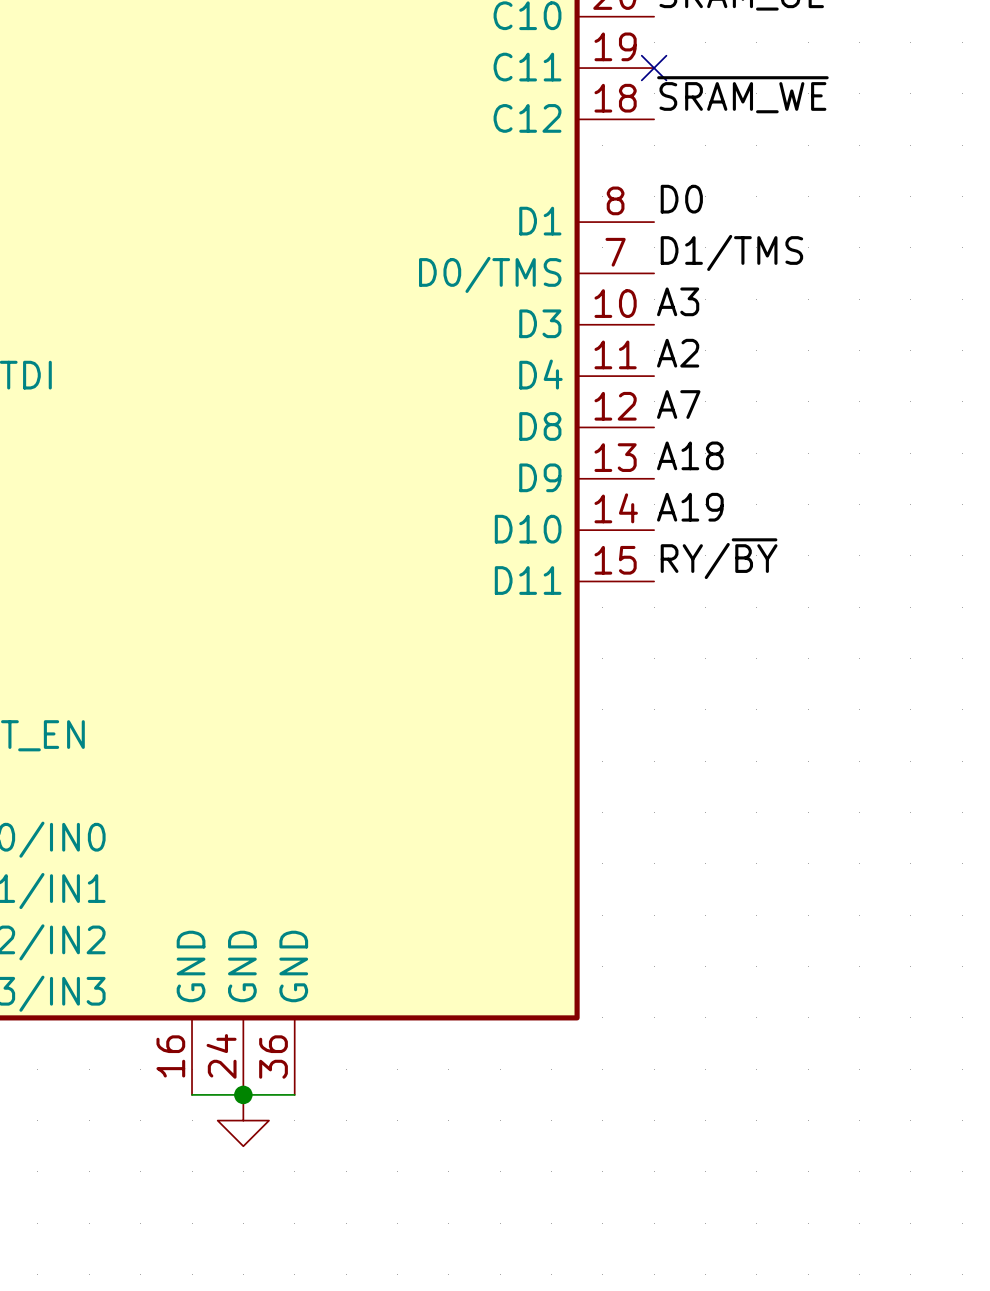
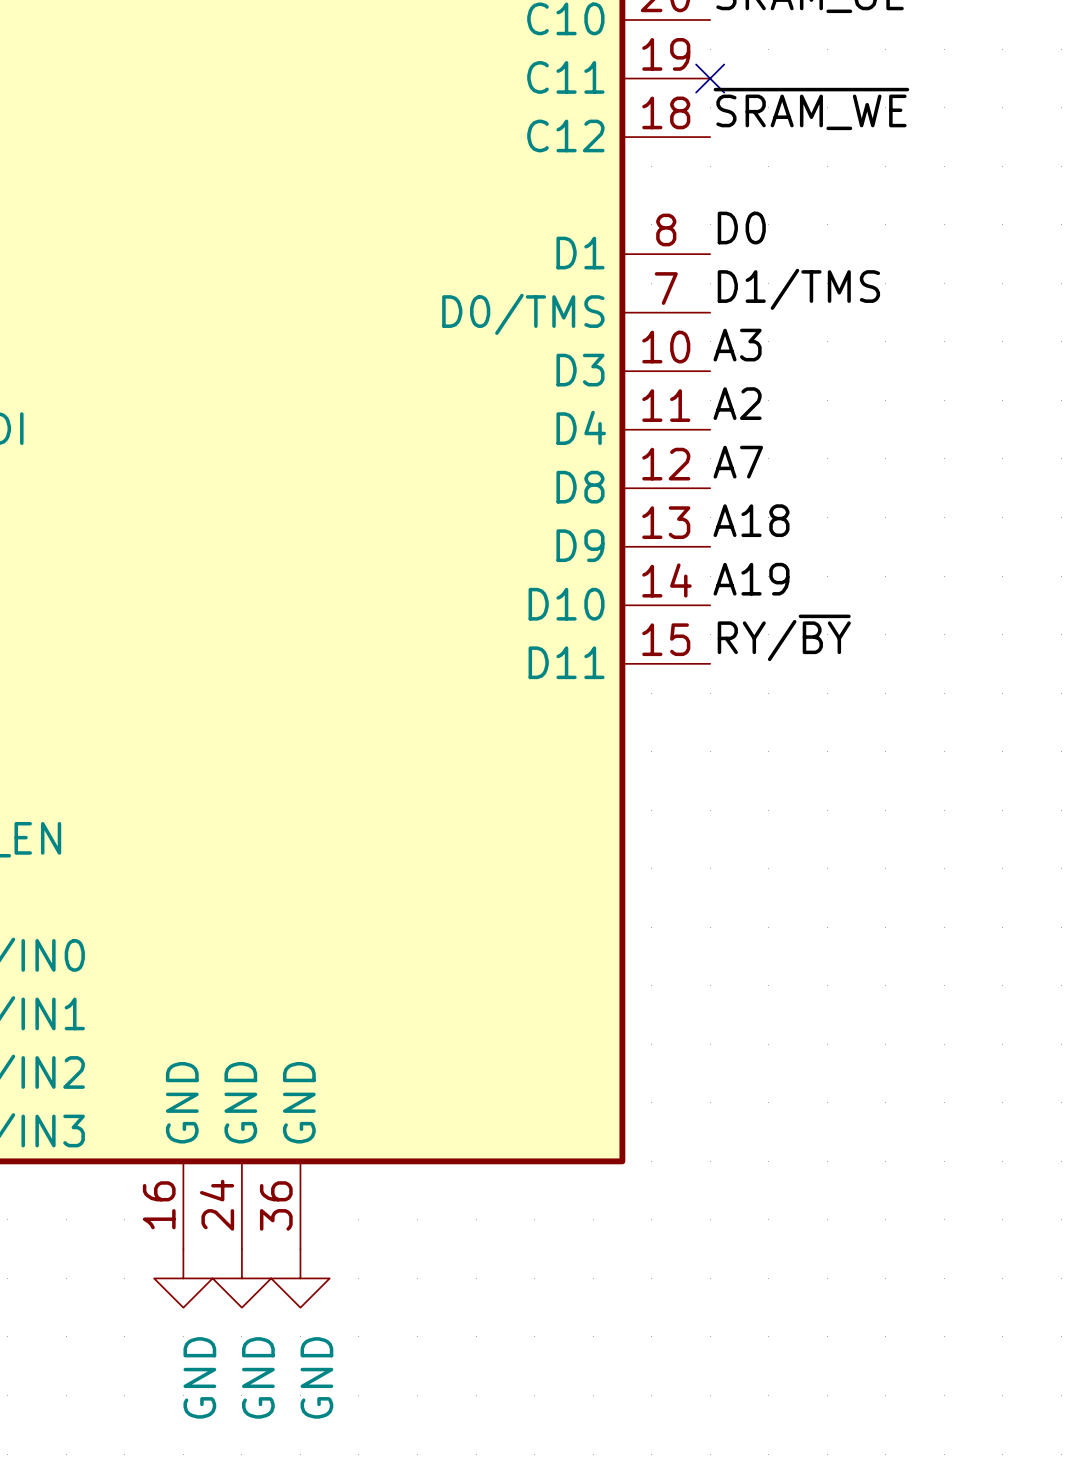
wire: (192, 1094) (294, 1094) -> none
junction: (243, 1094) -> none
power symbol: none -> GND (183, 1278)
power symbol: none -> GND (300, 1278)
power symbol text: none -> GND (258, 1377)

